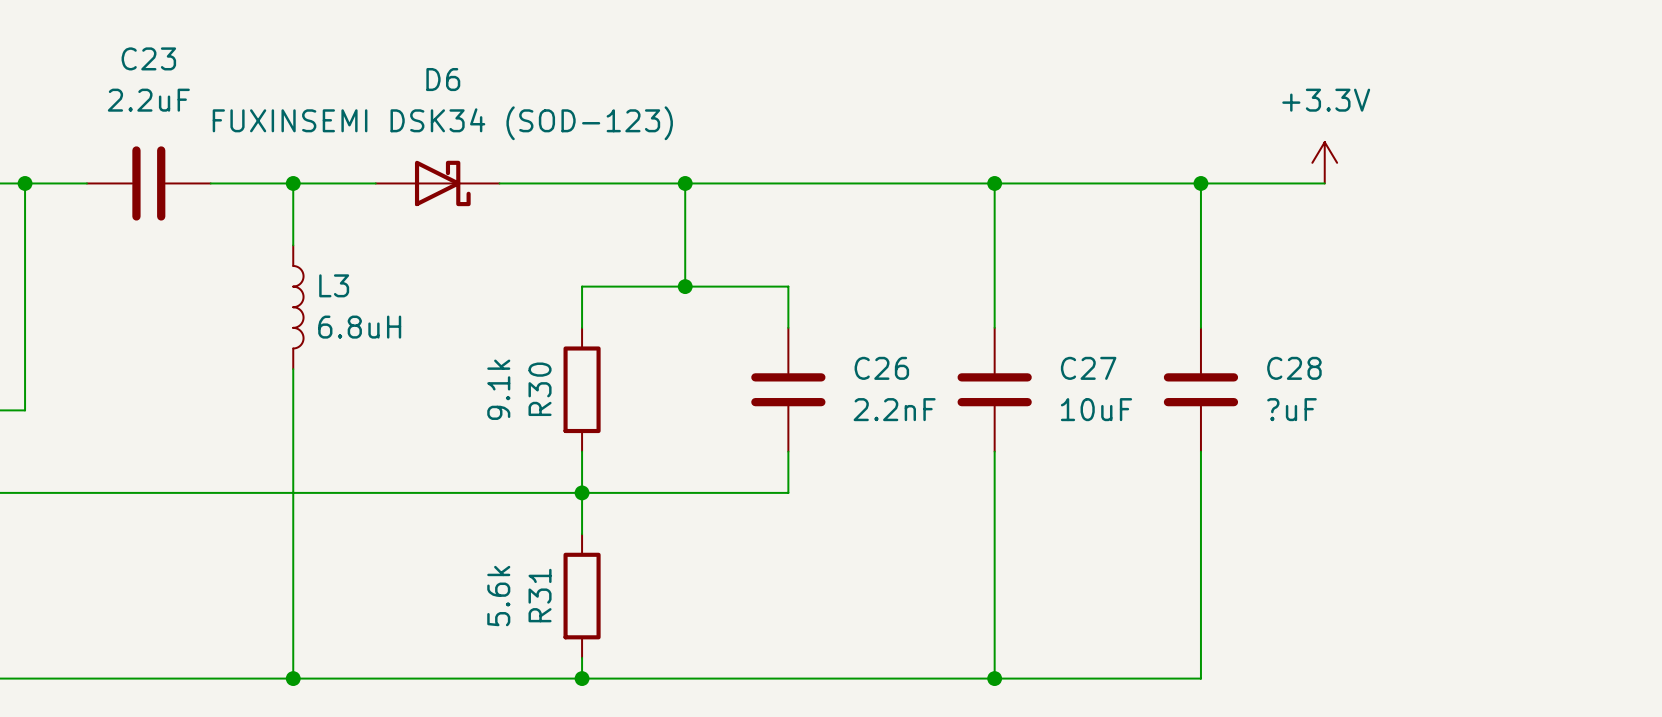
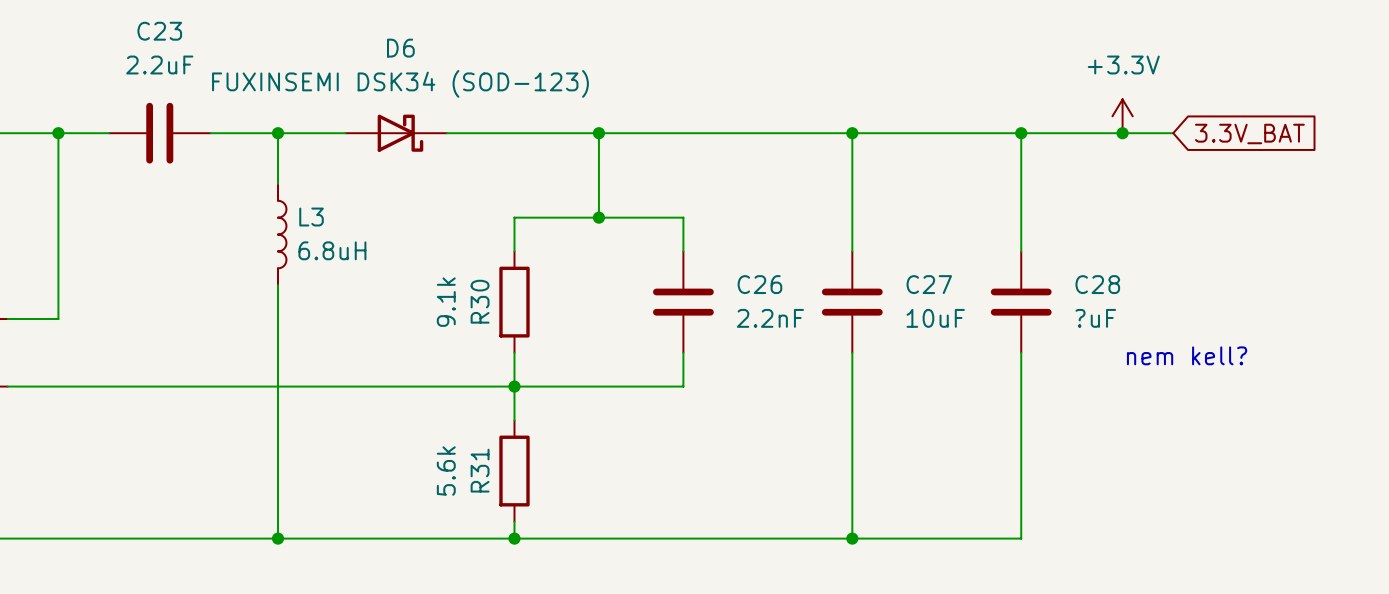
wire: none -> (1122, 133) (1173, 133)
junction: none -> (1122, 133)
global label: none -> 3.3V_BAT (1249, 134)
text: none -> nem kell? (1187, 355)

